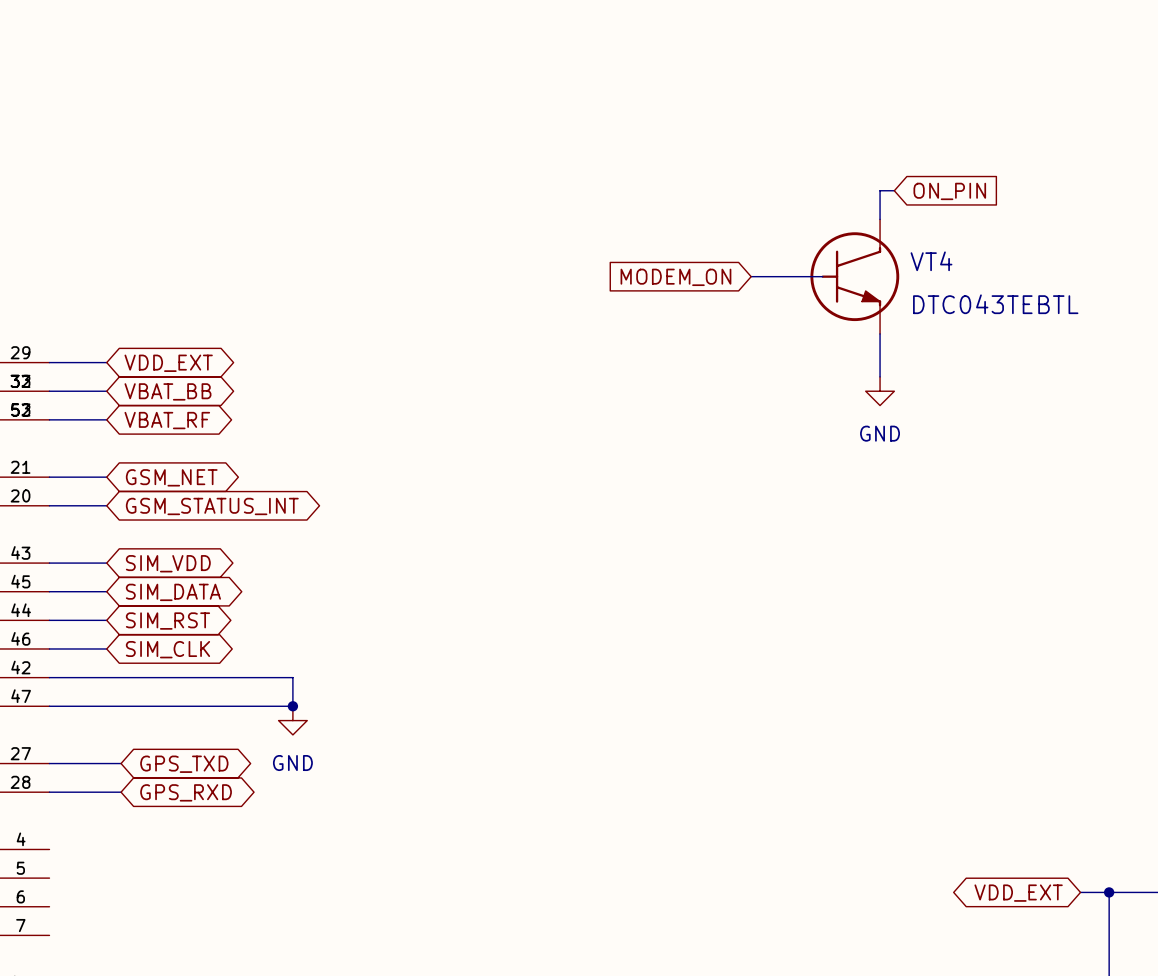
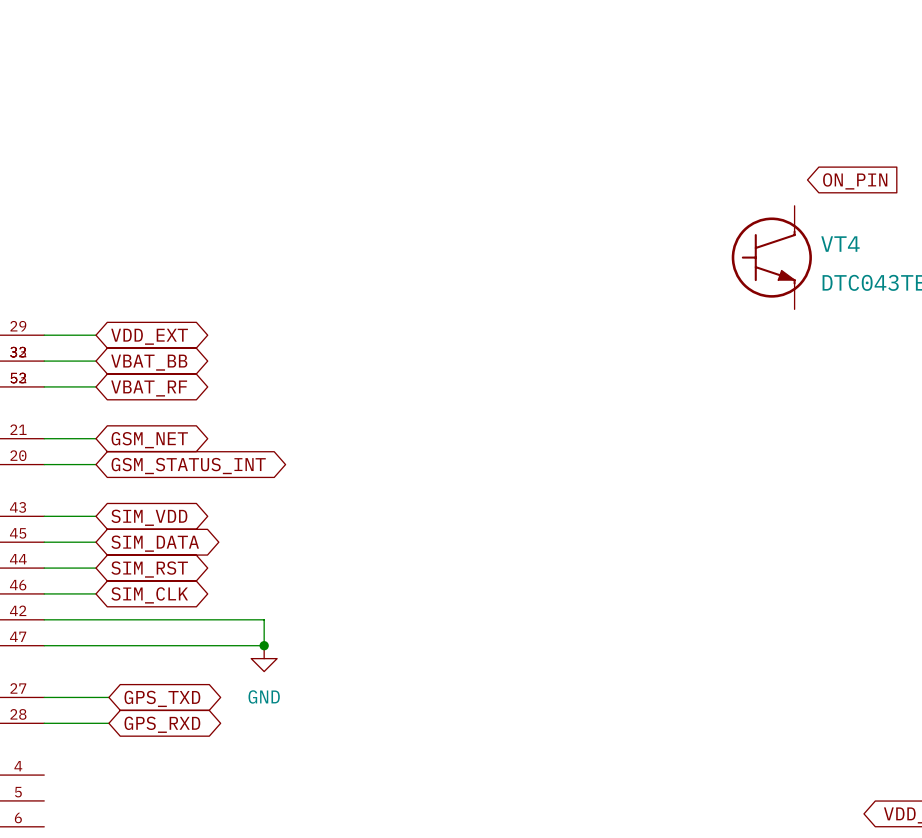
wire: (894, 190) (880, 190) (880, 219) -> none
wire: (751, 276) (822, 276) -> none
global label: MODEM_ON (675, 277) -> none
wire: (880, 333) (880, 376) -> none
power symbol: GND (880, 391) -> none

